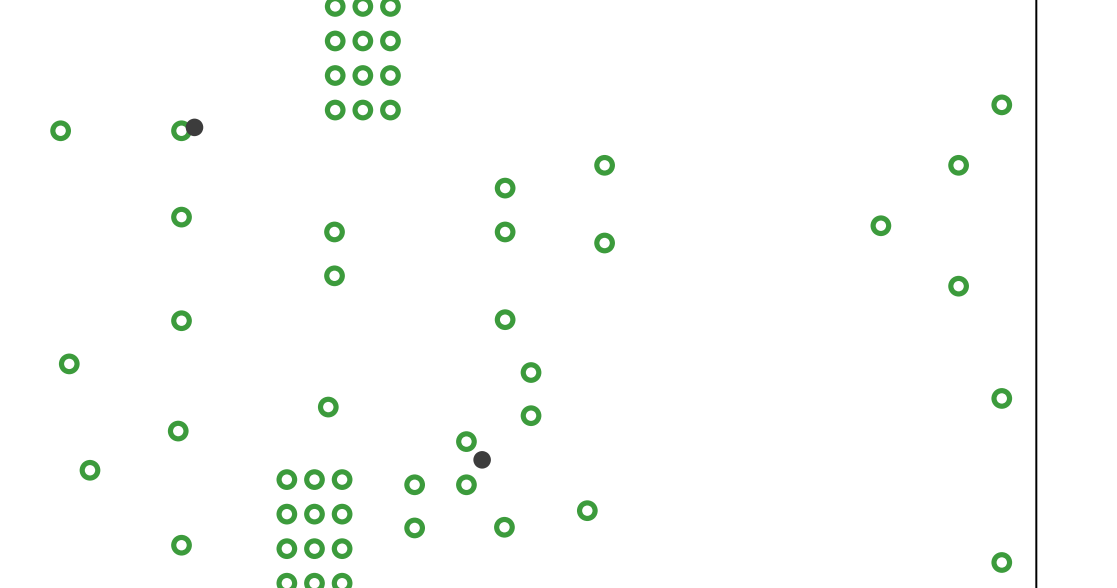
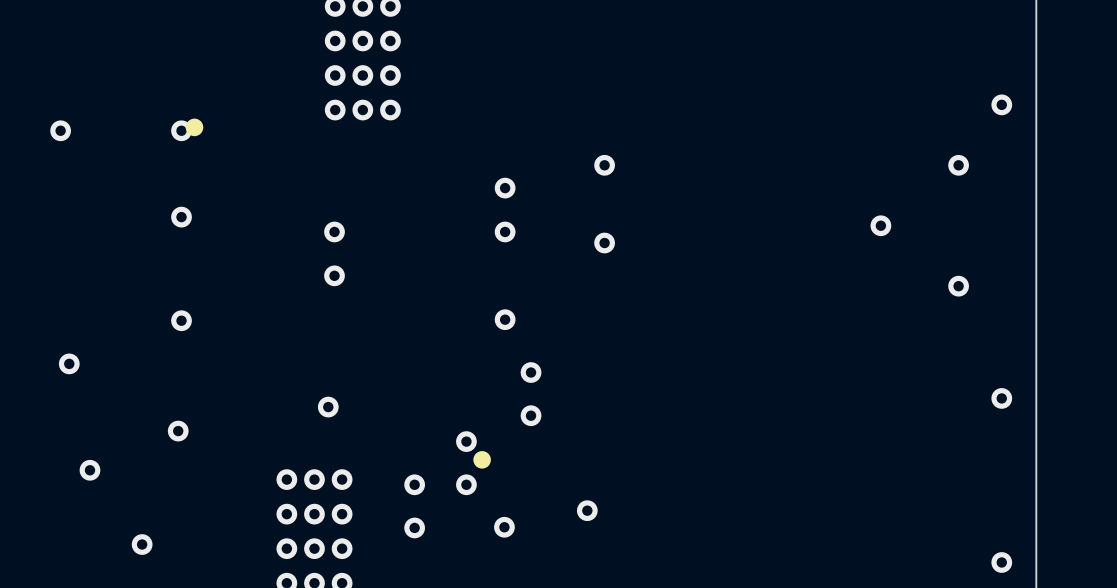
via position: (181, 545) -> (142, 544)

